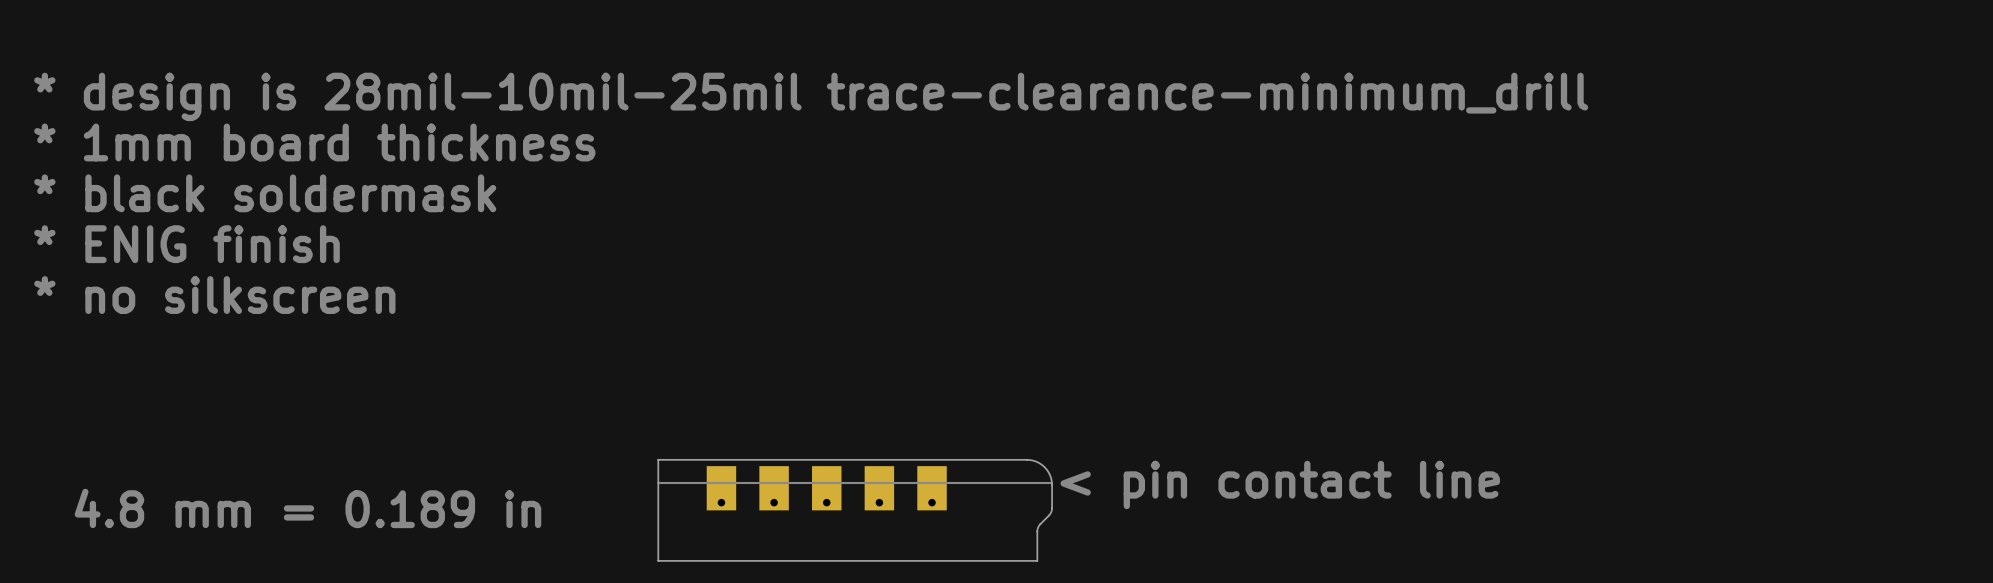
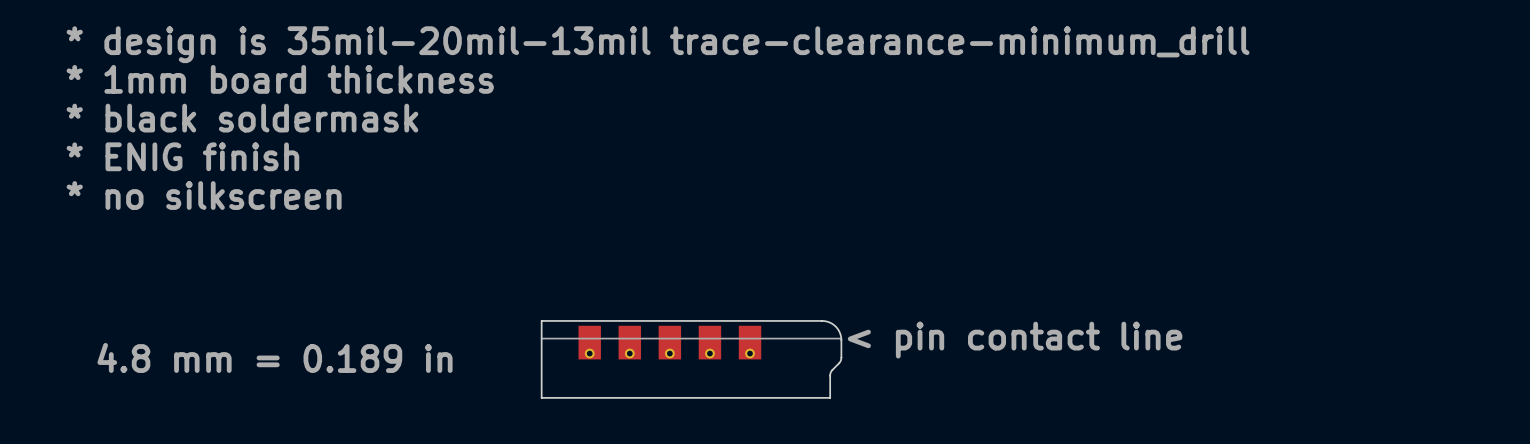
text: * design is 28mil-10mil-25mil trace-clearance-minimum_drill (811, 96) -> * design is 35mil-20mil-13mil trace-clearance-minimum_drill (658, 44)

